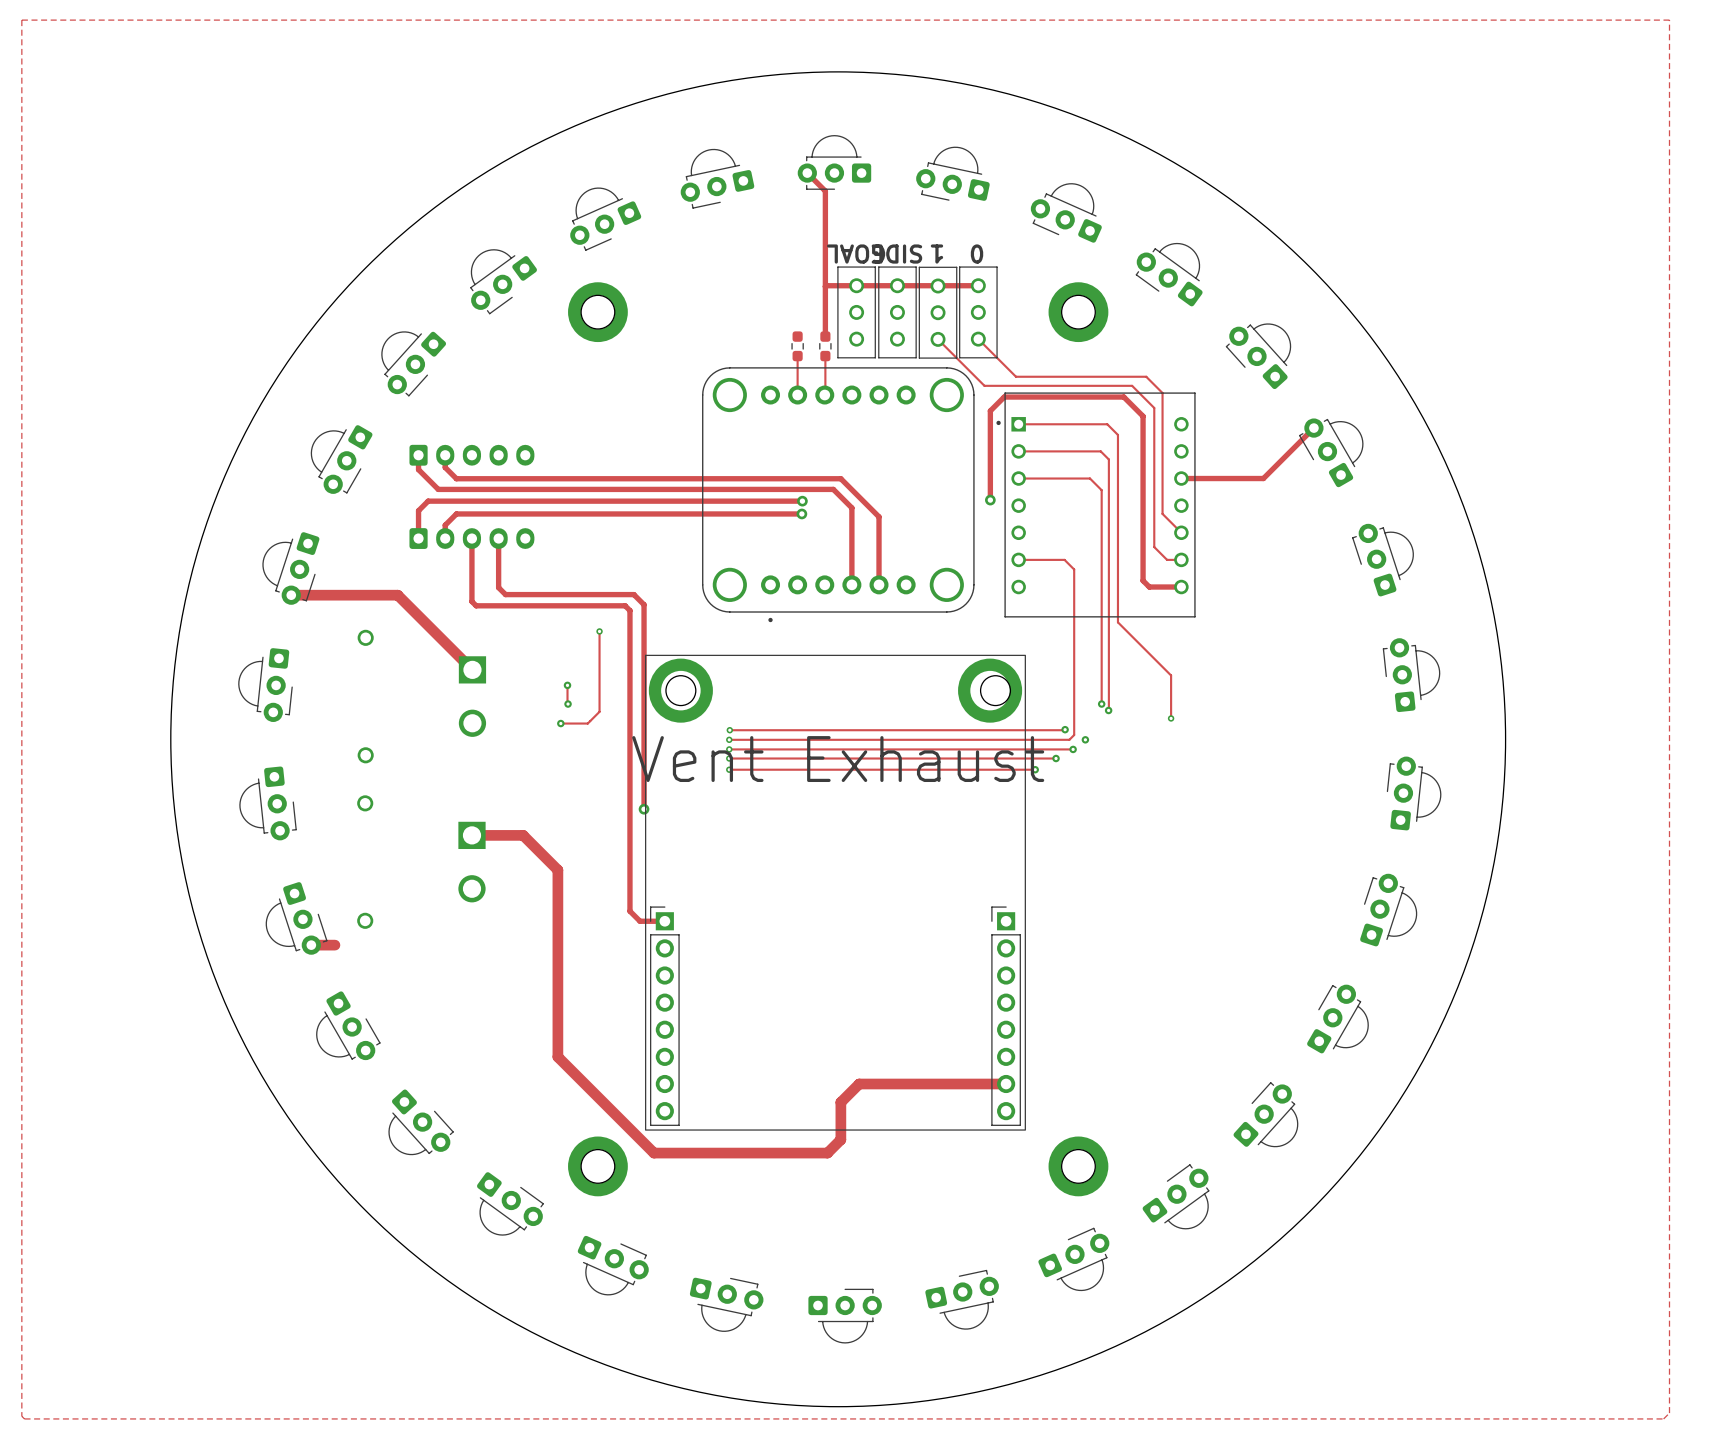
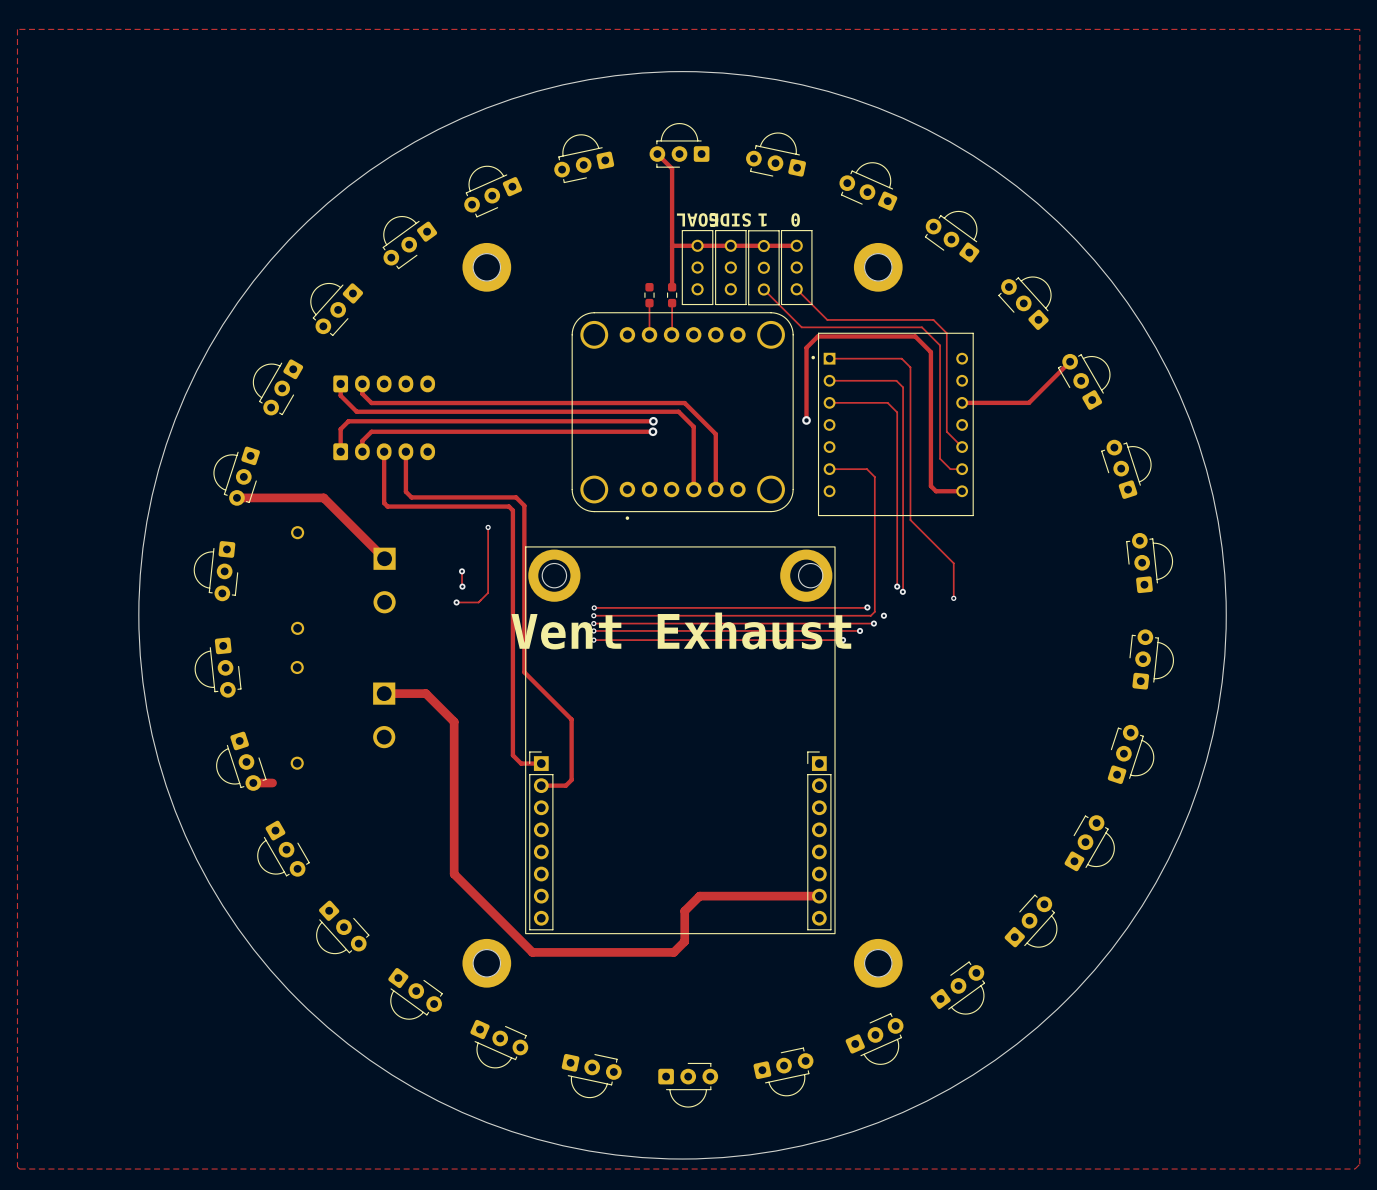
track: none -> (524, 672) (571, 719) (571, 779) (565, 785) (541, 785)
via: (644, 809) -> none

